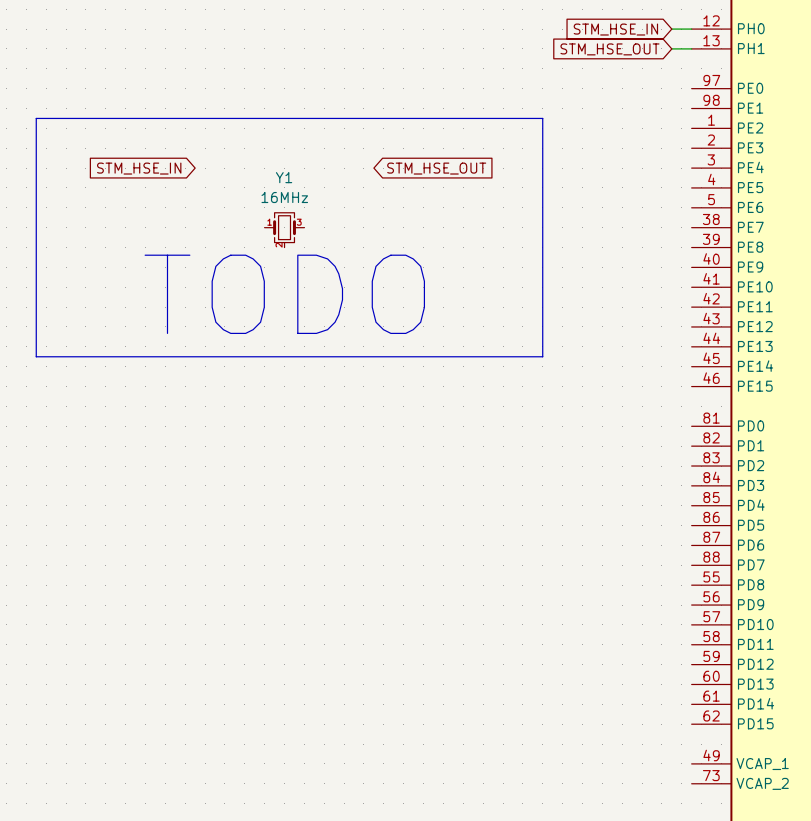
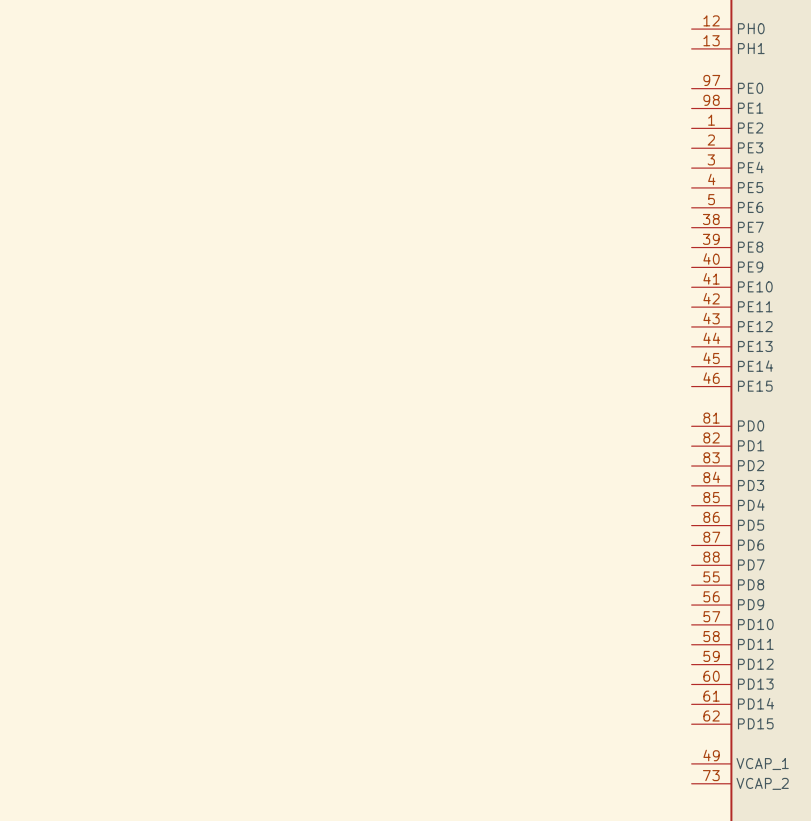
global label: STM_HSE_IN (615, 29) -> none
wire: (671, 29) (691, 29) -> none
wire: (671, 48) (691, 48) -> none
global label: STM_HSE_OUT (609, 49) -> none
line: (36, 118) (542, 118) (542, 356) (36, 356) (36, 118) -> none
global label: STM_HSE_IN (139, 168) -> none
global label: STM_HSE_OUT (436, 168) -> none
Y1: 16MHz (284, 230) -> none
text: TODO (284, 294) -> none

